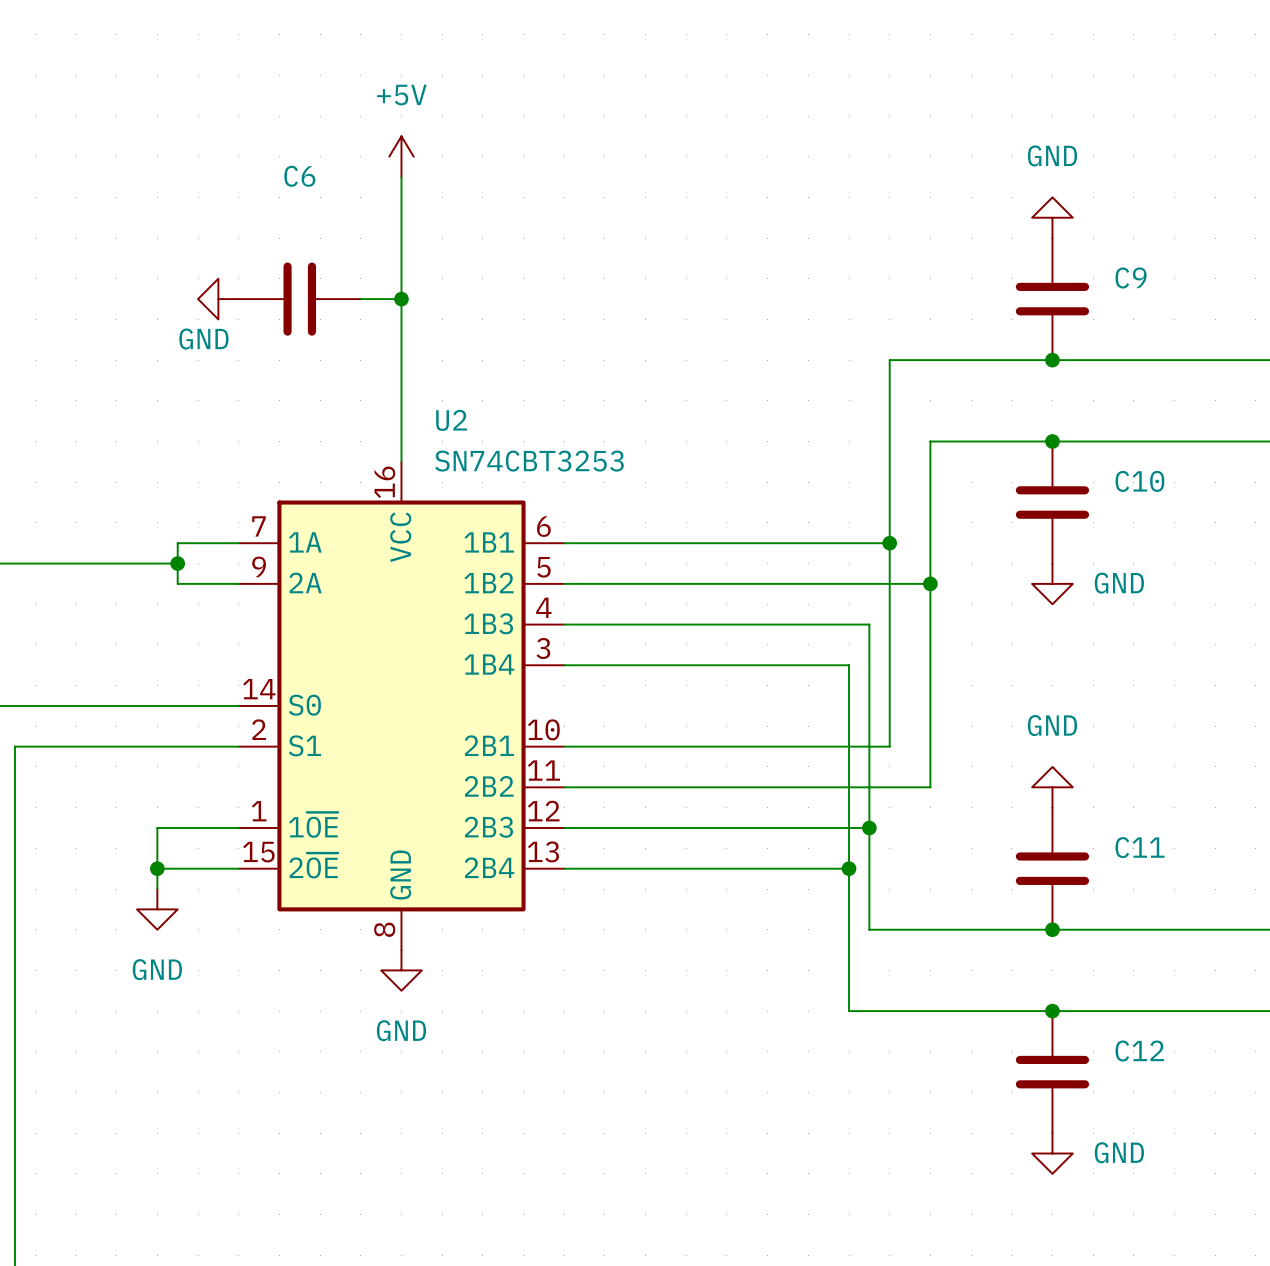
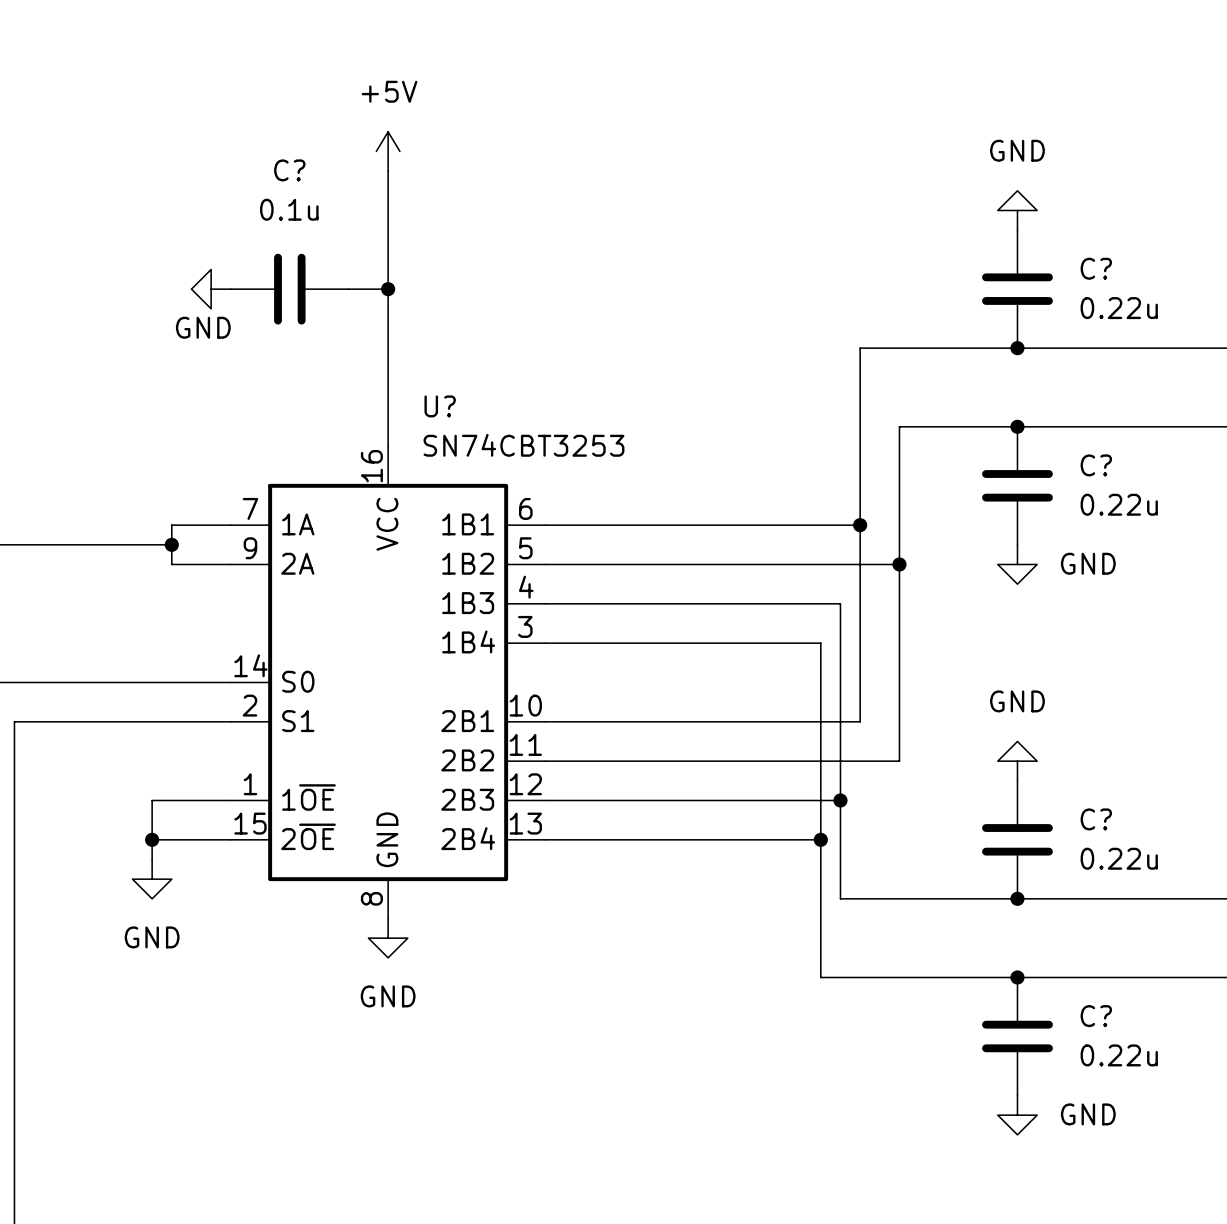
C6 name: C6 (299, 176) -> C? (289, 170)
C6 value: none -> 0.1u (289, 209)
C9 name: C9 (1131, 277) -> C? (1096, 268)
C9 value: none -> 0.22u (1119, 308)
U2 name: U2 (451, 420) -> U? (440, 406)
C10 name: C10 (1139, 481) -> C? (1096, 465)
C10 value: none -> 0.22u (1119, 504)
C11 name: C11 (1140, 847) -> C? (1096, 819)
C11 value: none -> 0.22u (1119, 858)
C12 name: C12 (1139, 1051) -> C? (1096, 1016)
C12 value: none -> 0.22u (1119, 1055)

